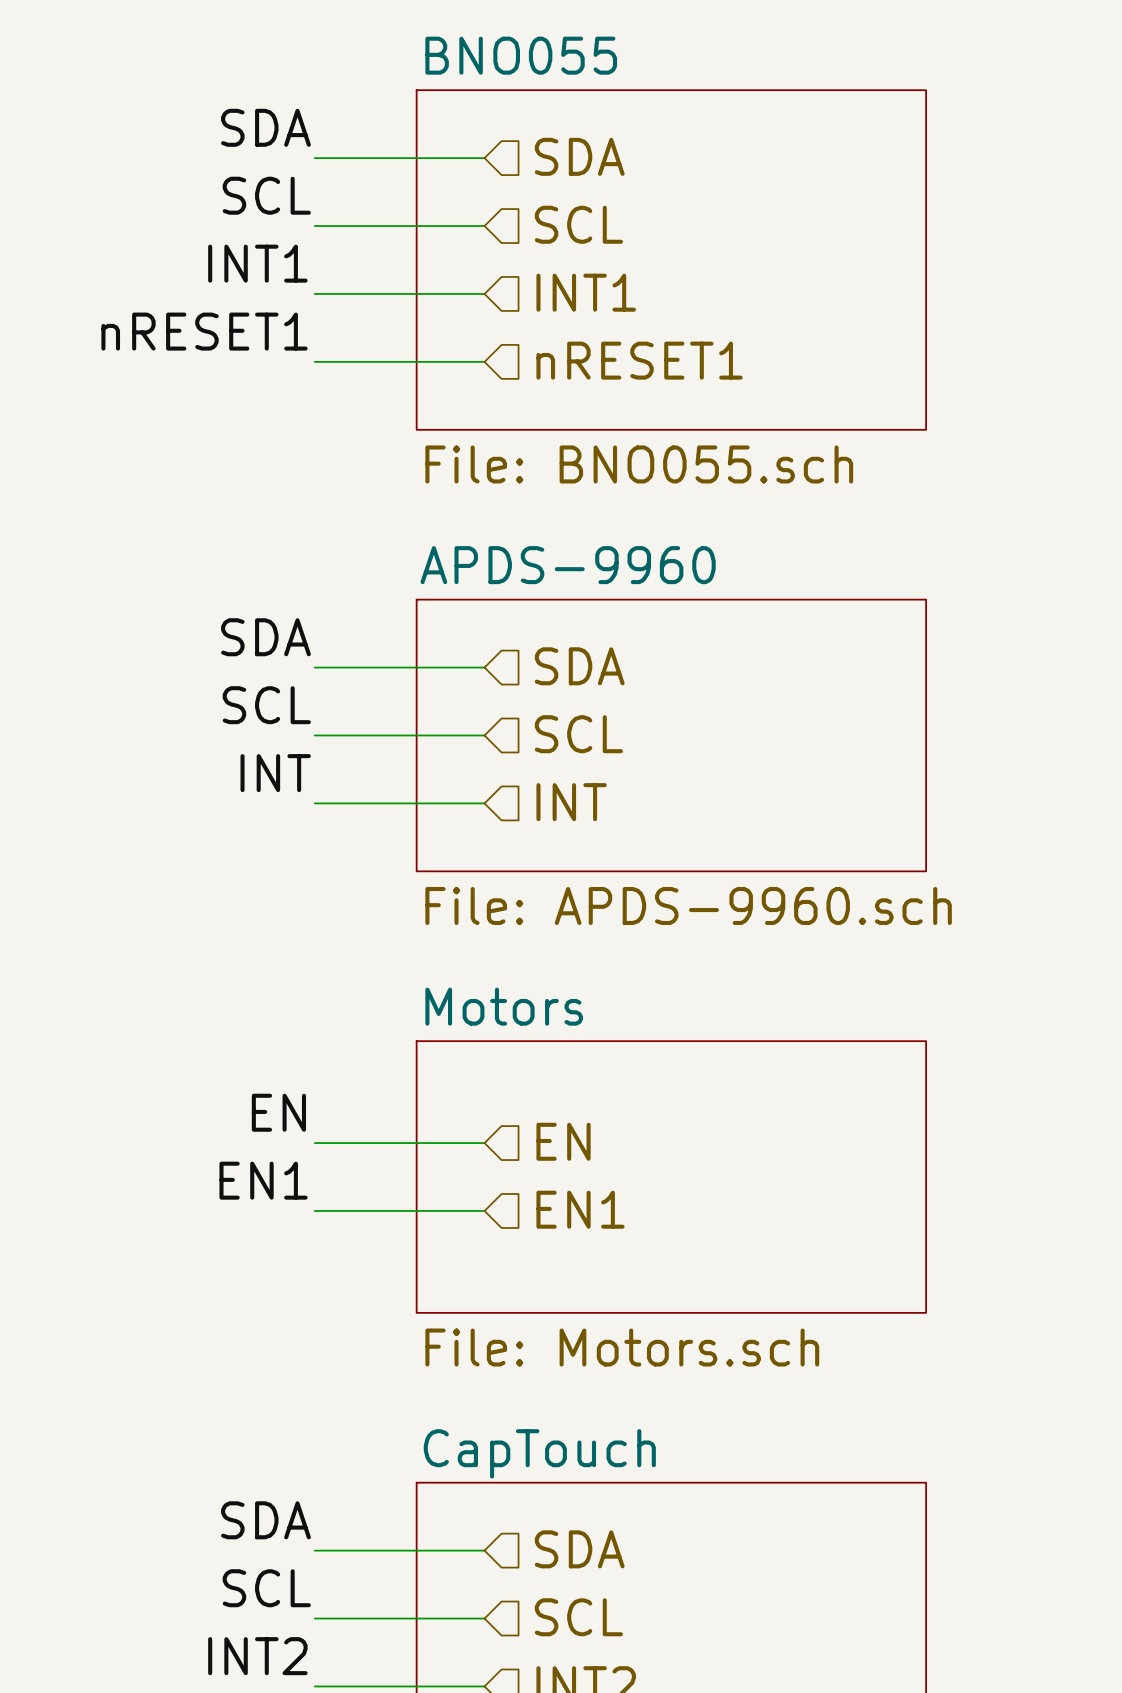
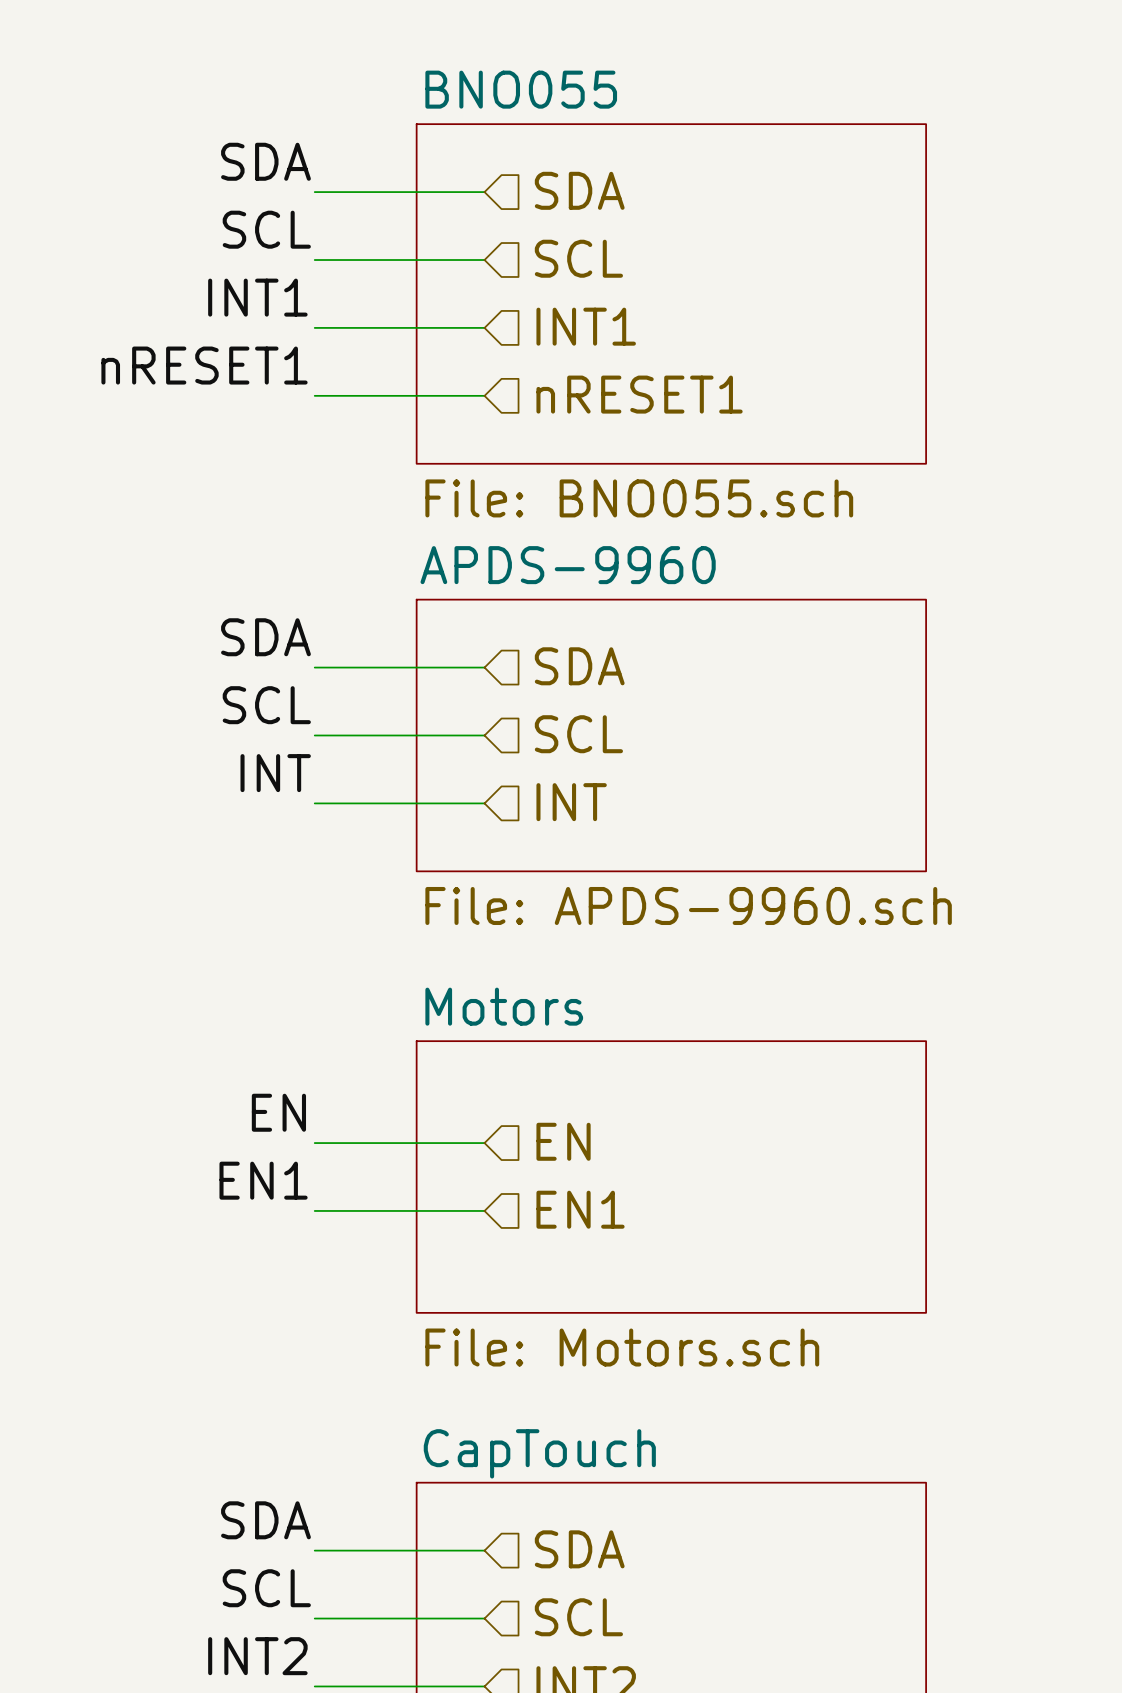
label position: SDA (265, 127) -> SDA (265, 161)
hierarchical label position: SDA (579, 156) -> SDA (579, 190)
wire: (314, 158) (484, 158) -> (314, 192) (484, 192)
label position: SCL (266, 195) -> SCL (266, 229)
hierarchical label position: SCL (578, 224) -> SCL (578, 258)
wire: (314, 226) (484, 226) -> (314, 260) (484, 260)
sheet BNO055 position: (671, 260) -> (671, 293)
label position: INT1 (257, 263) -> INT1 (257, 297)
hierarchical label position: INT1 (586, 292) -> INT1 (586, 326)
wire: (314, 293) (484, 293) -> (314, 327) (484, 327)
label position: nRESET1 (204, 331) -> nRESET1 (204, 365)
hierarchical label position: nRESET1 (639, 360) -> nRESET1 (639, 394)
wire: (314, 361) (484, 361) -> (314, 395) (484, 395)

